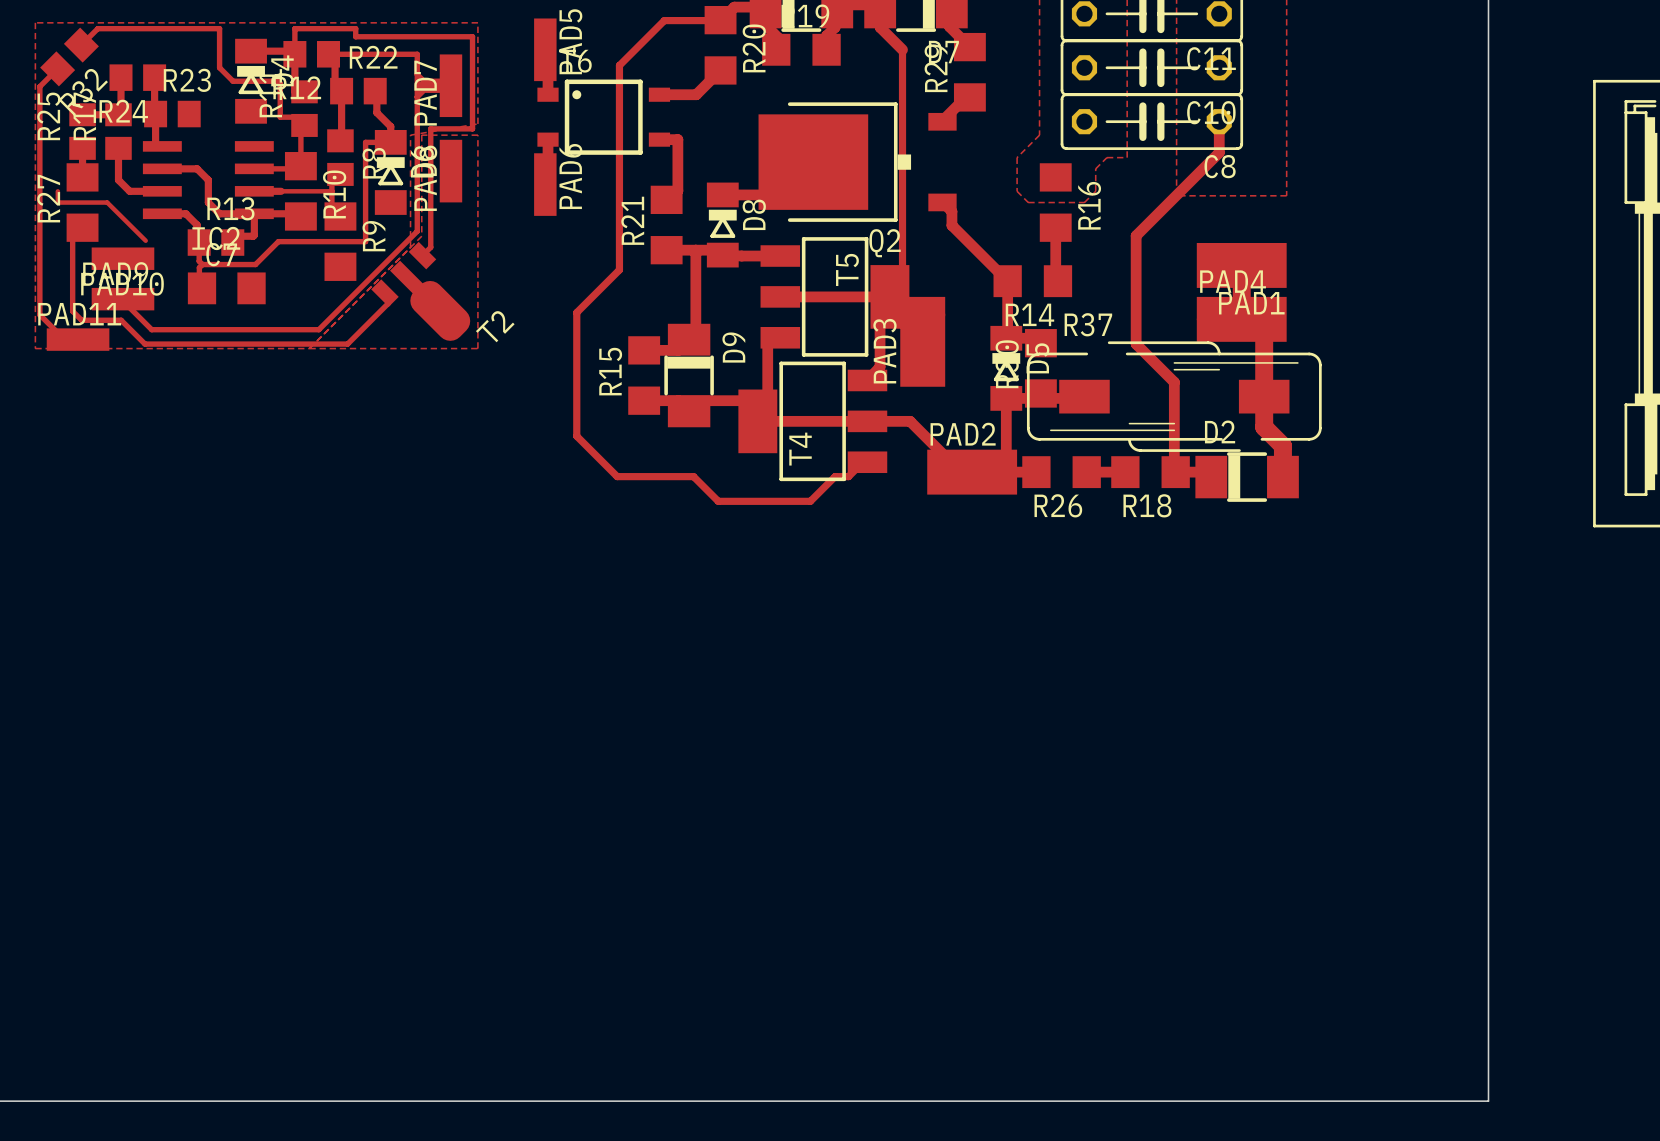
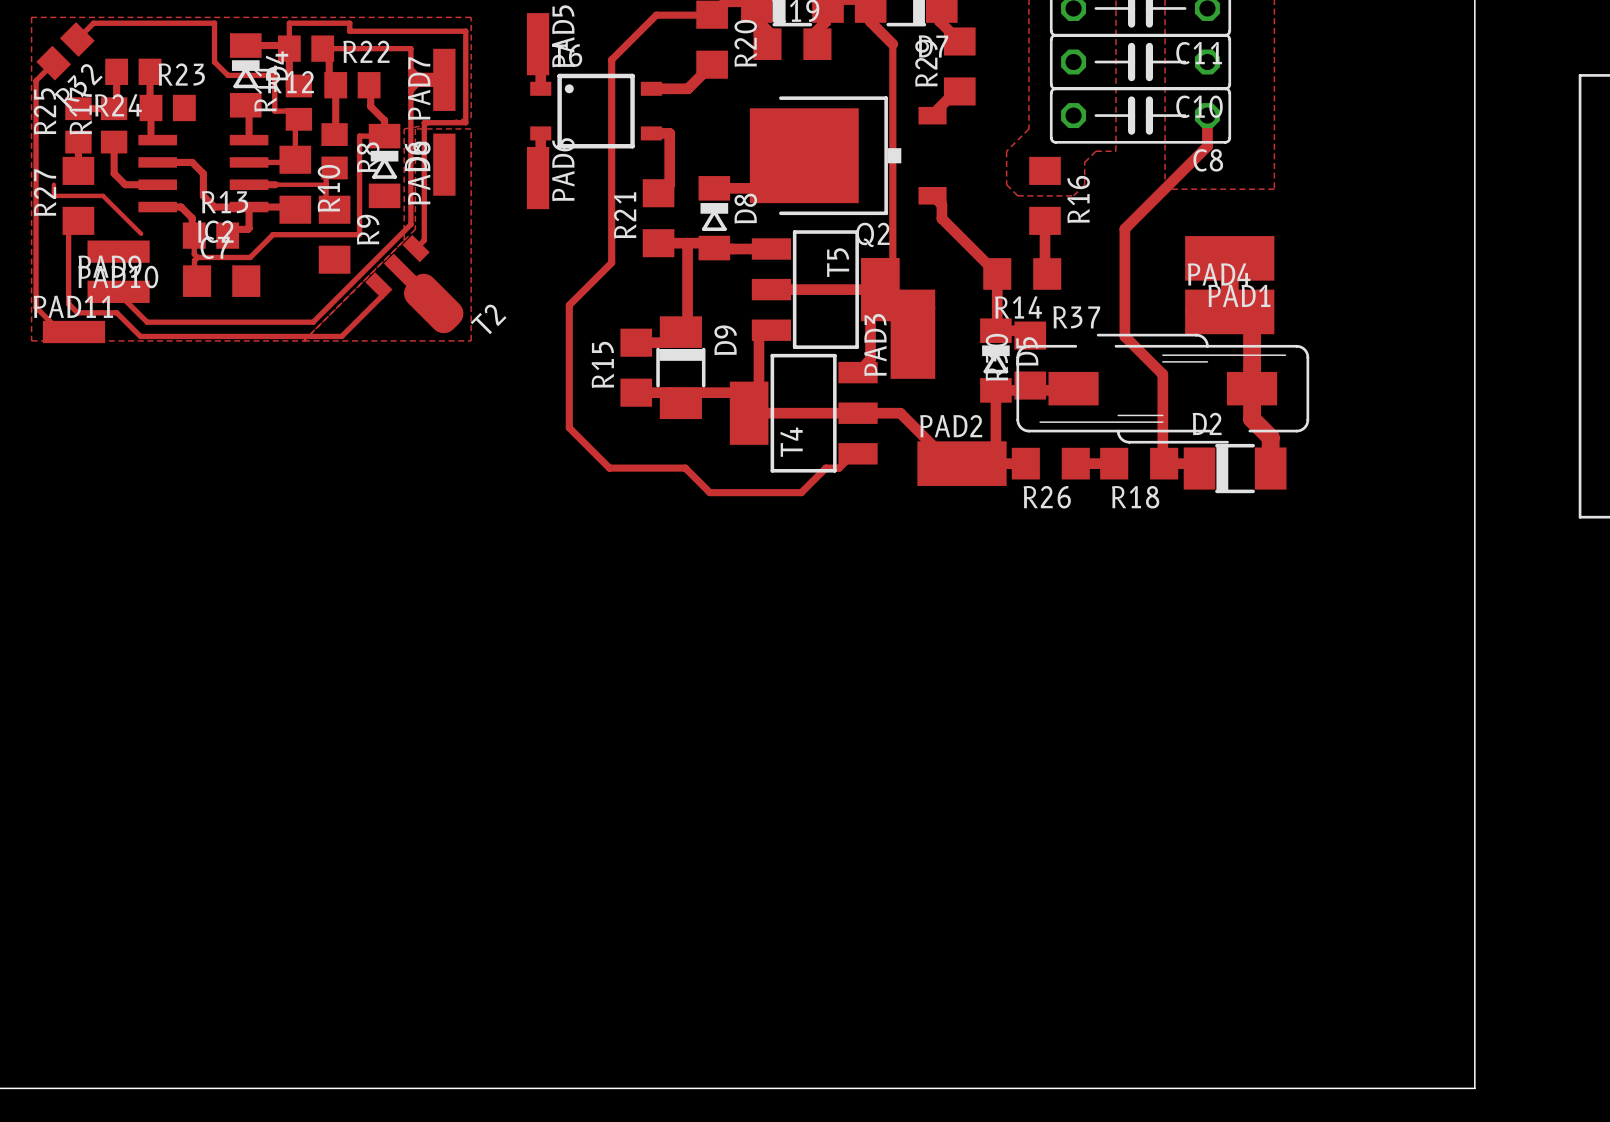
top track: none -> (245, 105) (249, 108) (249, 140)

